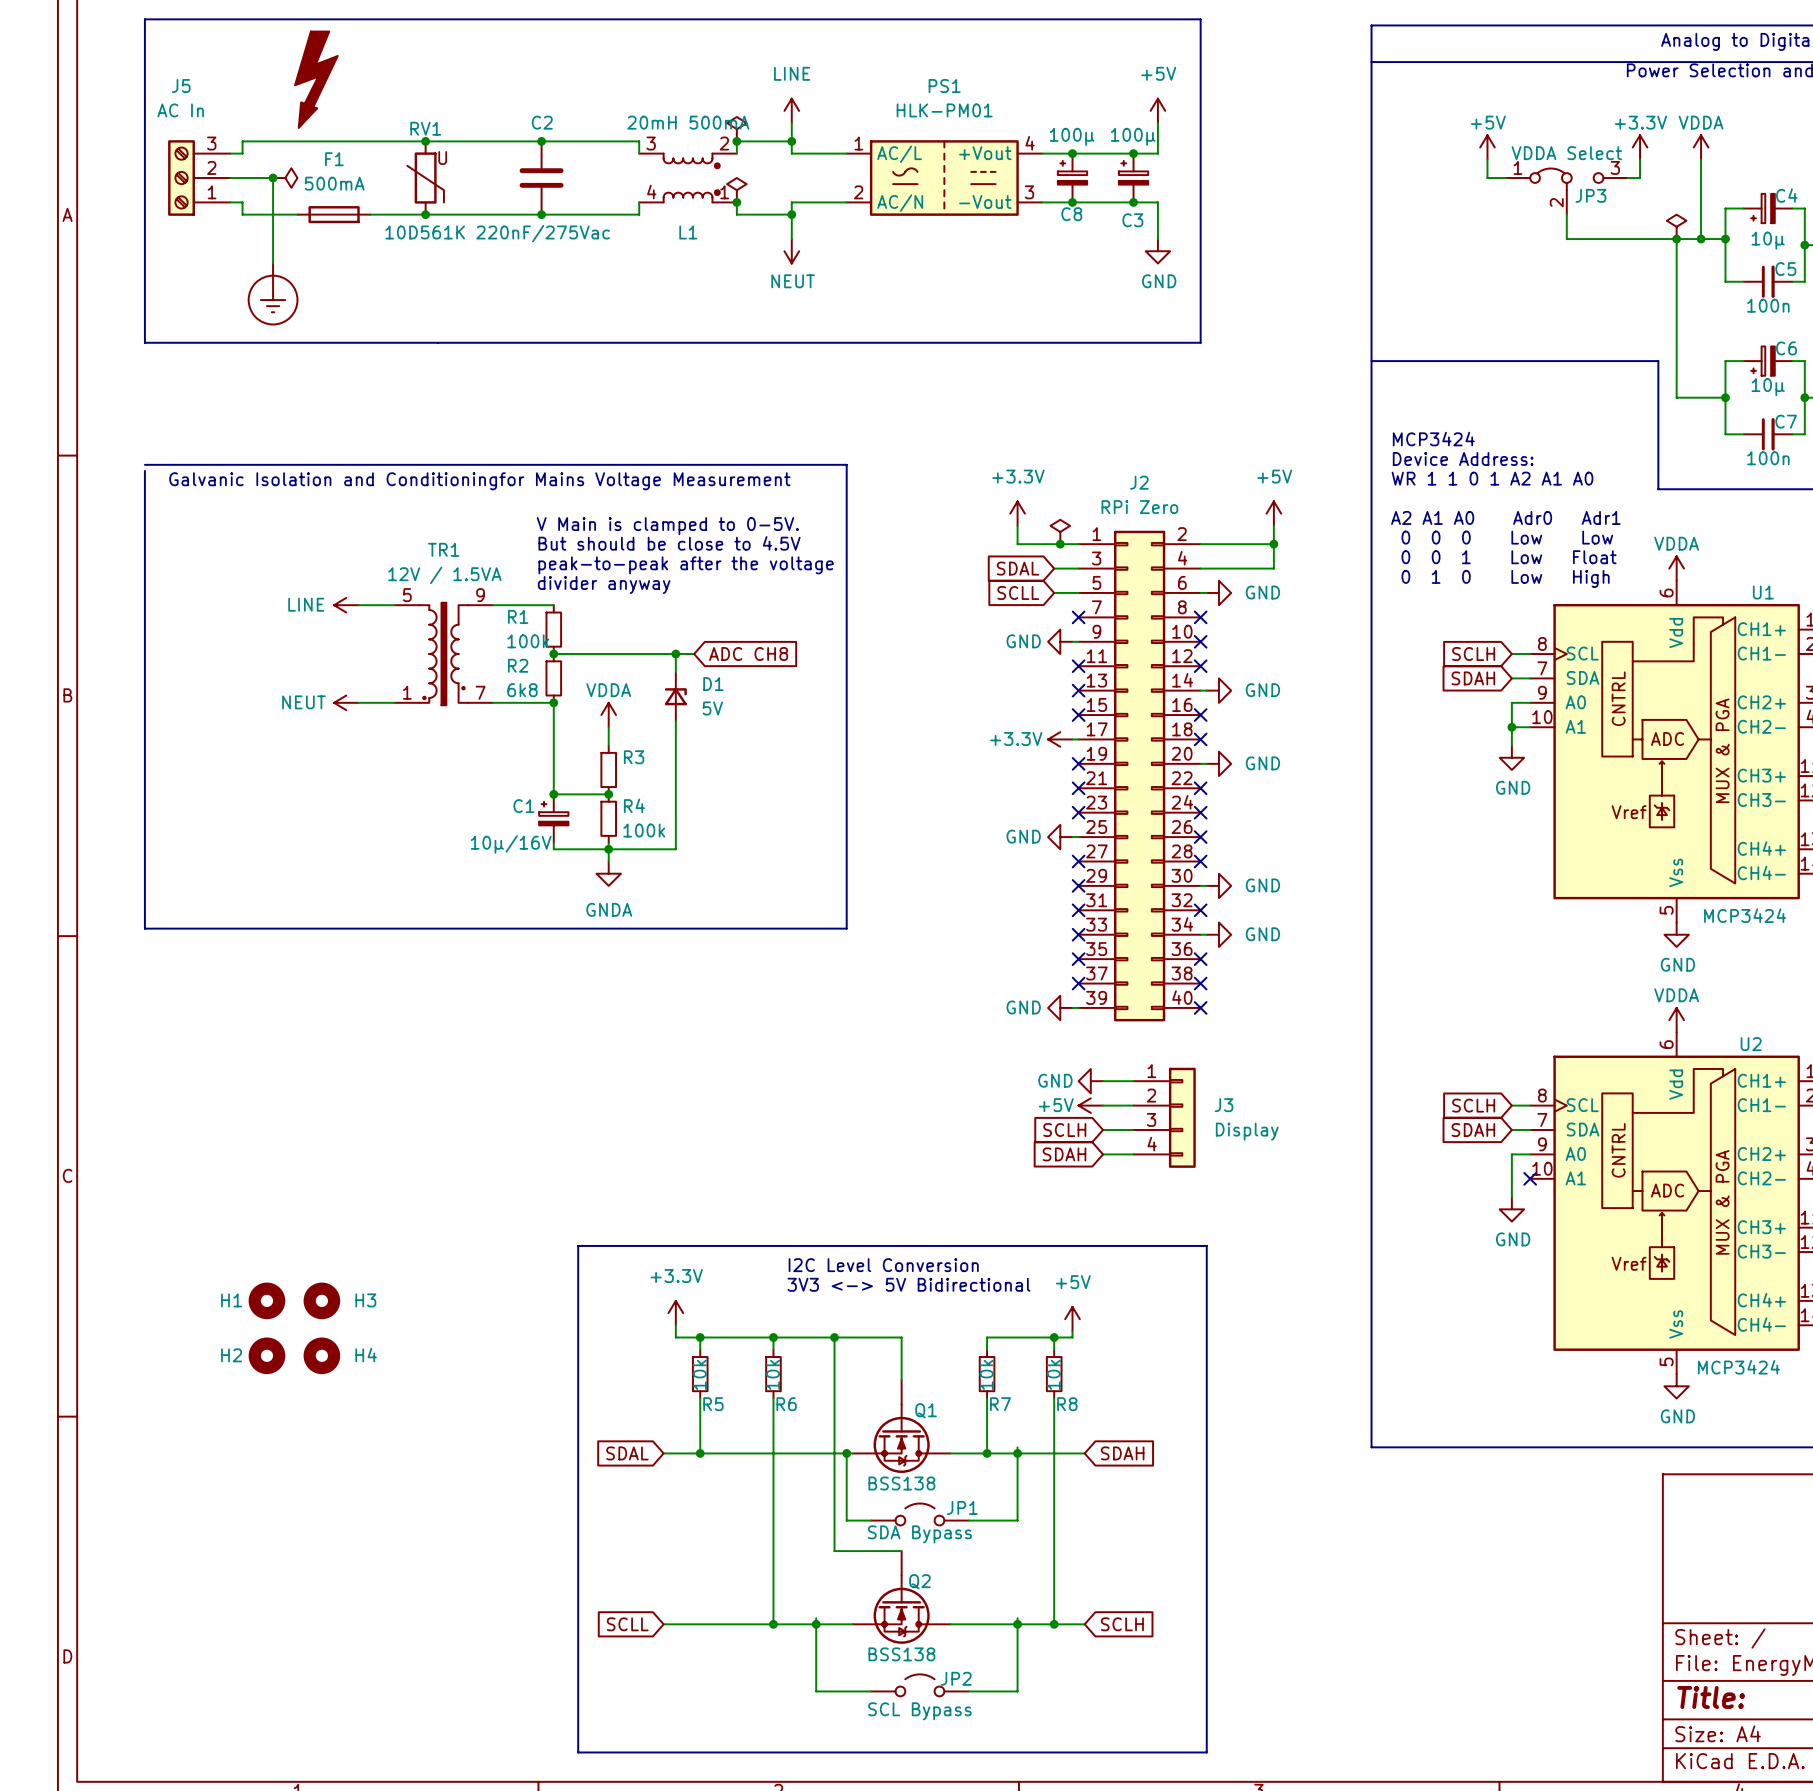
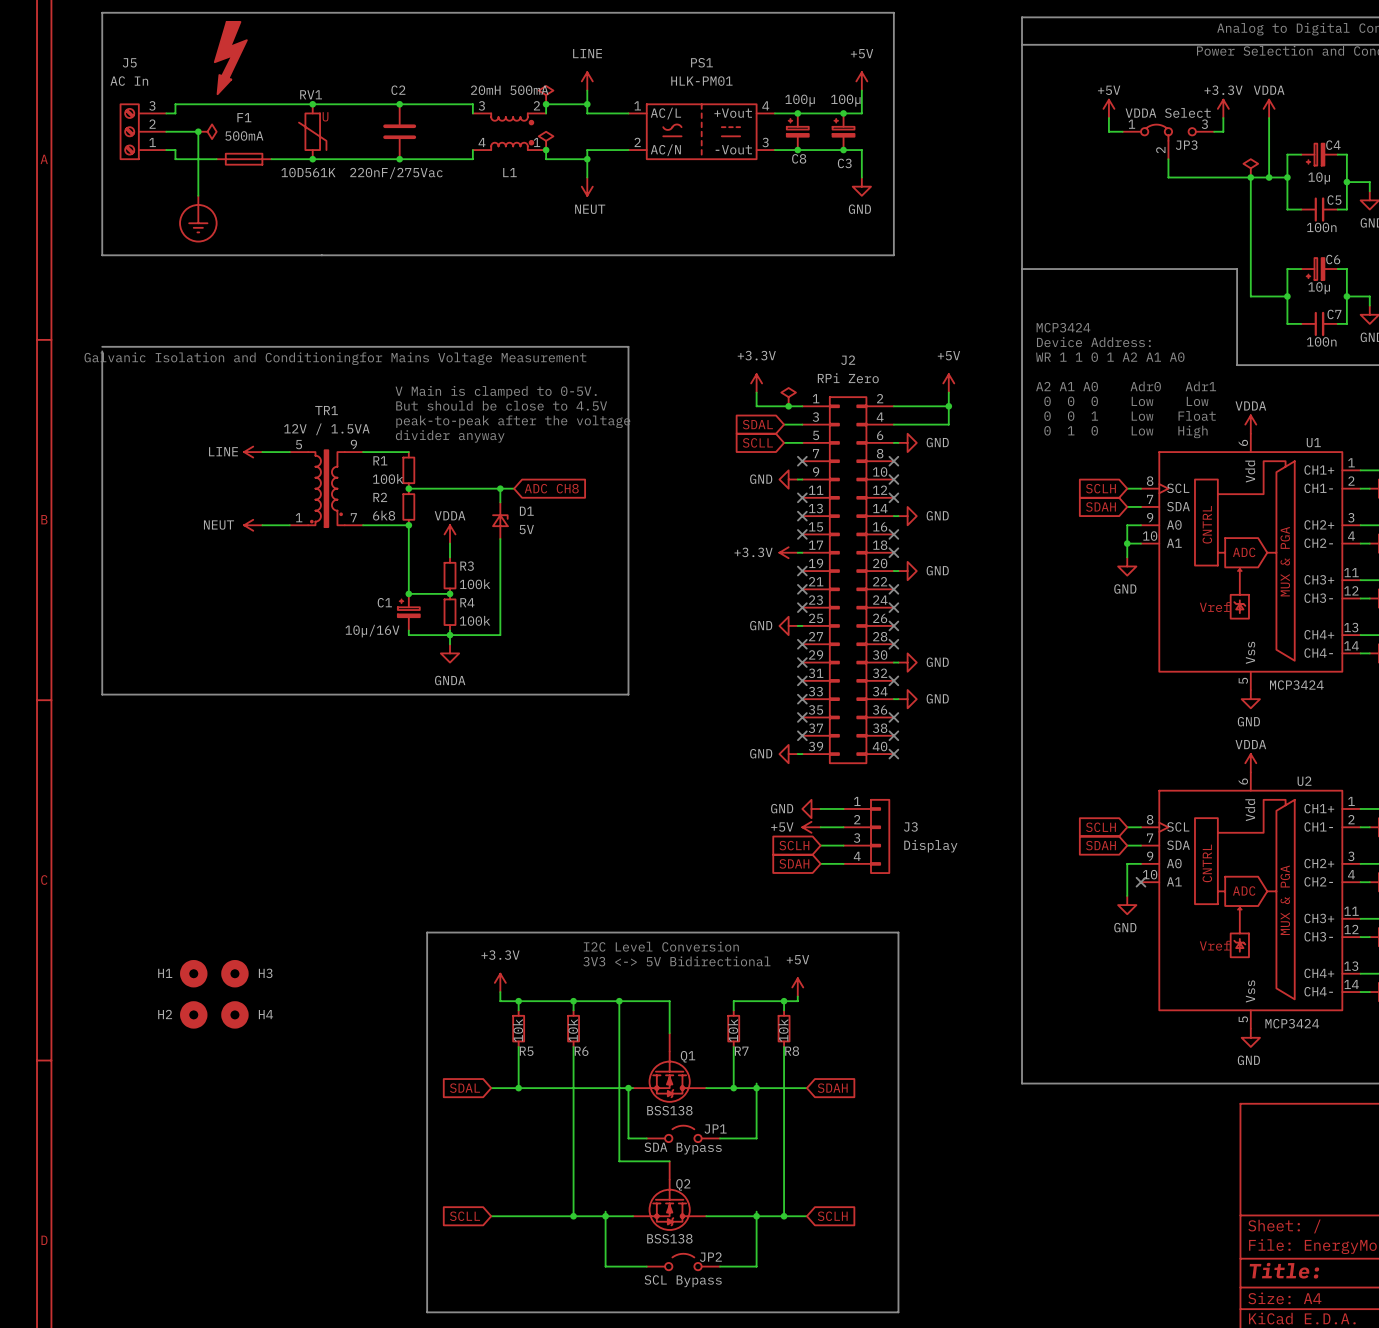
R3 value: none -> 100k (475, 584)

